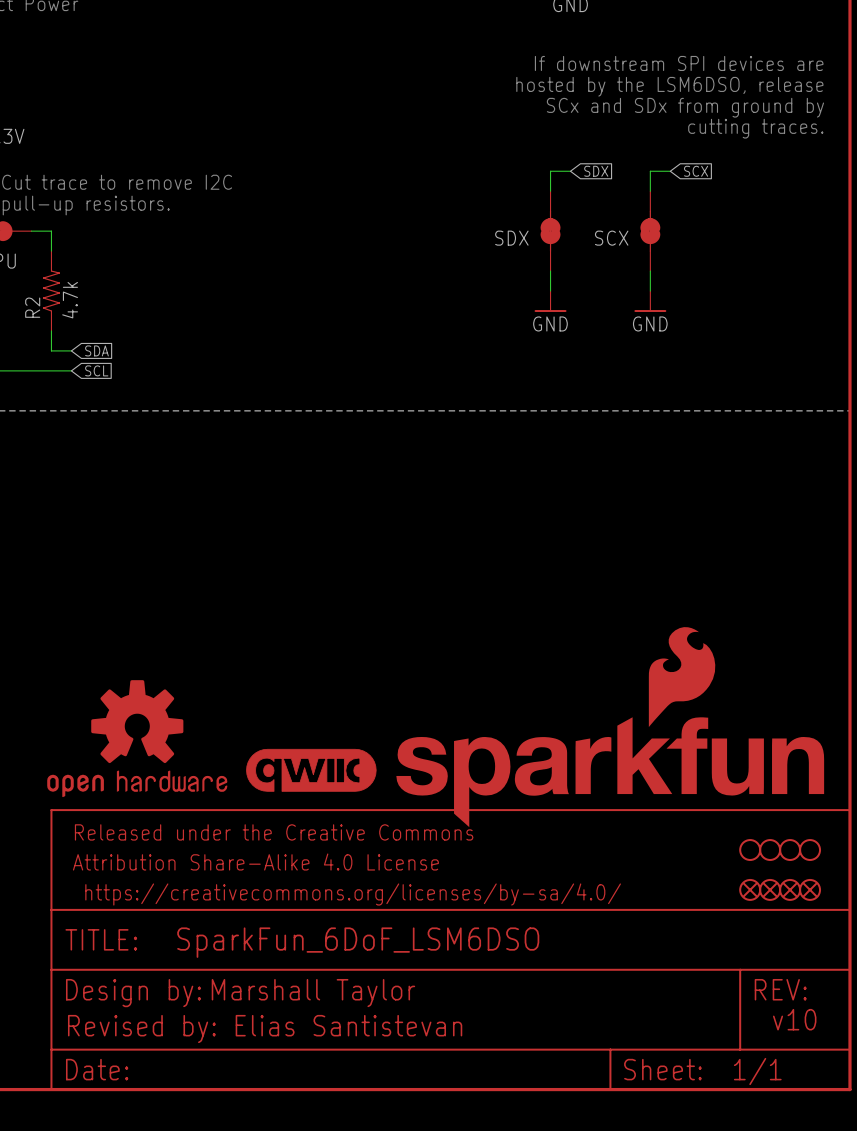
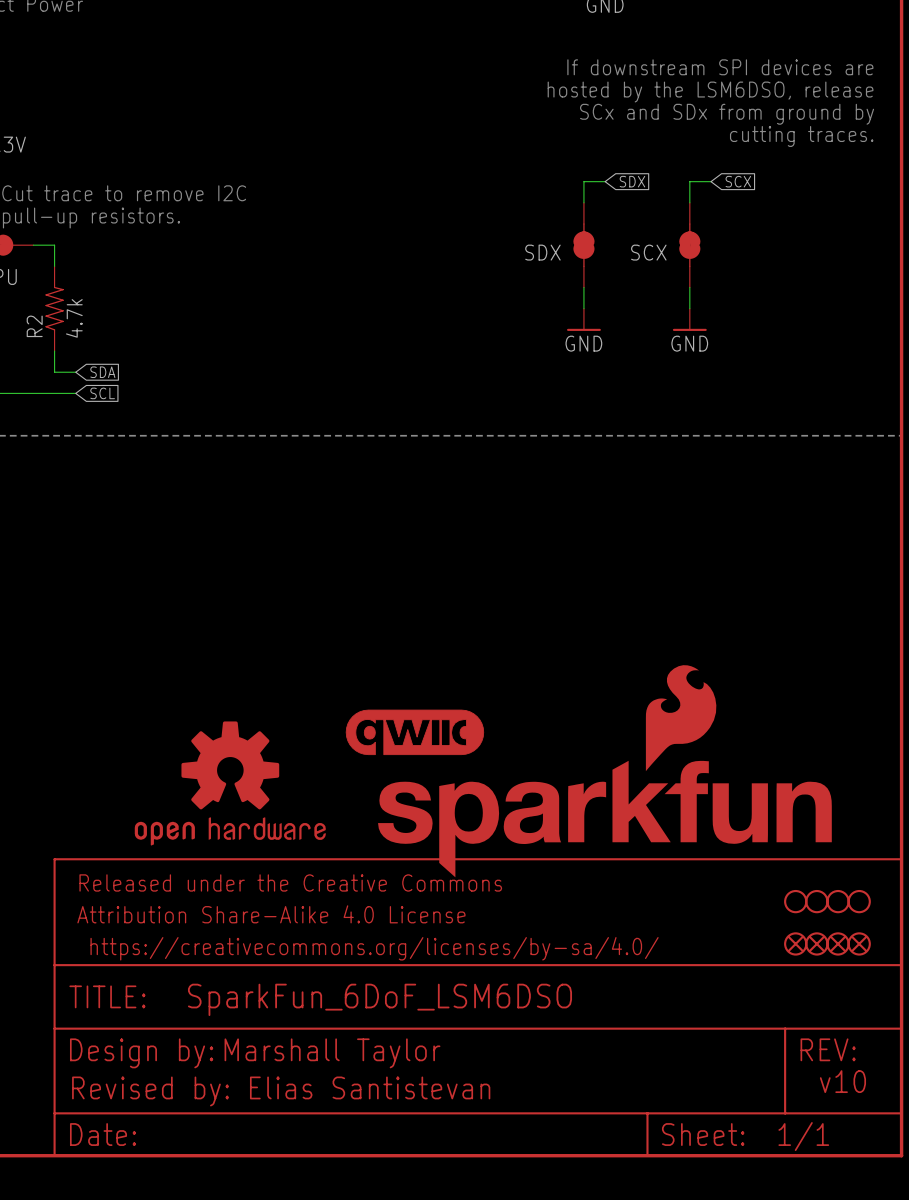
part position: (610, 727) -> (604, 771)
part position: (137, 738) -> (230, 783)
part position: (311, 770) -> (414, 732)

